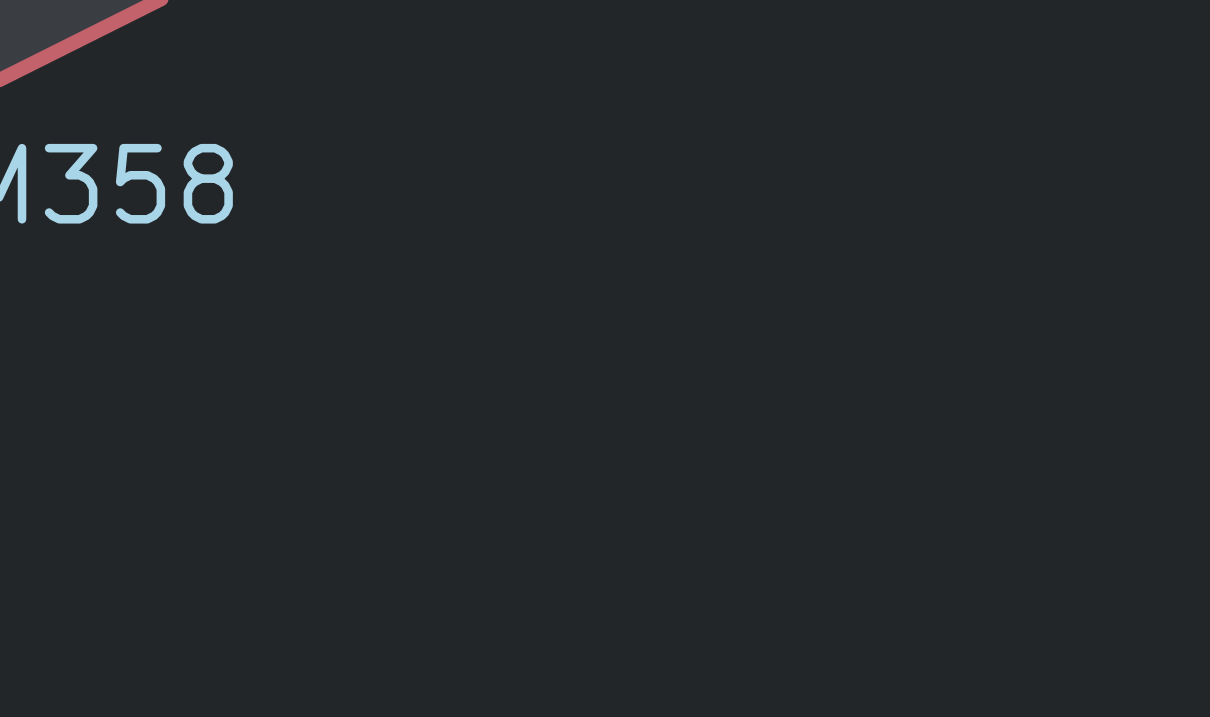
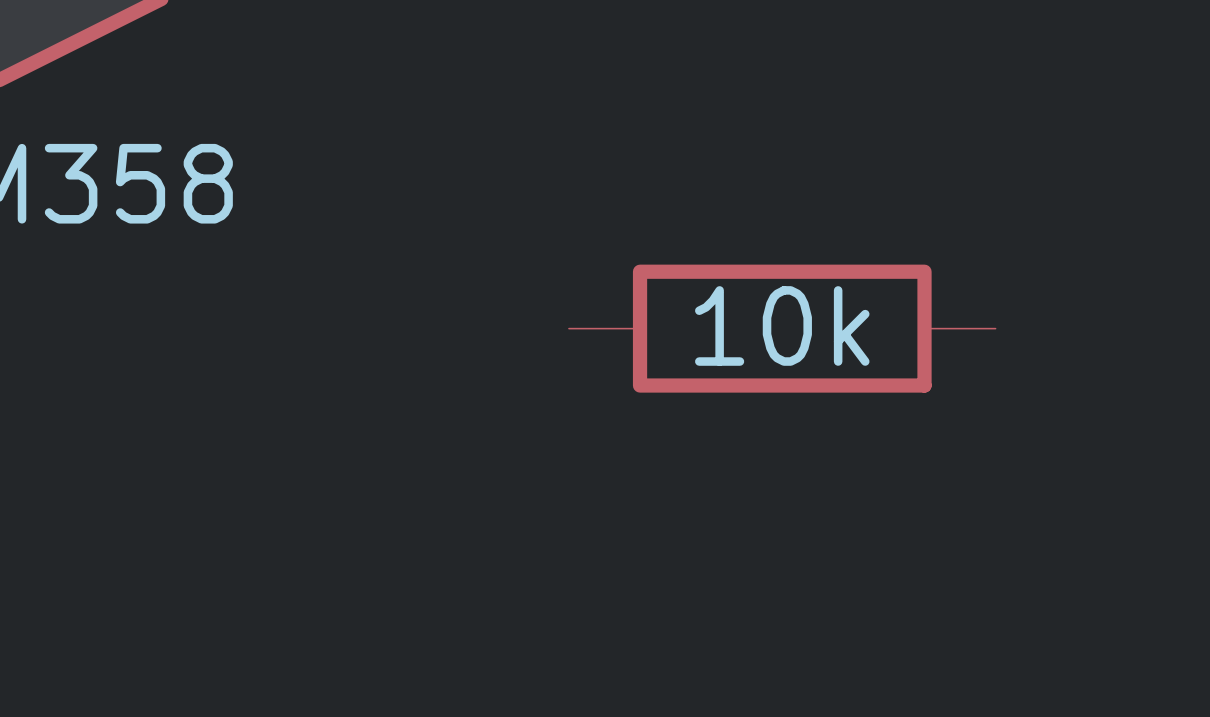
part: none -> 10k (782, 328)

